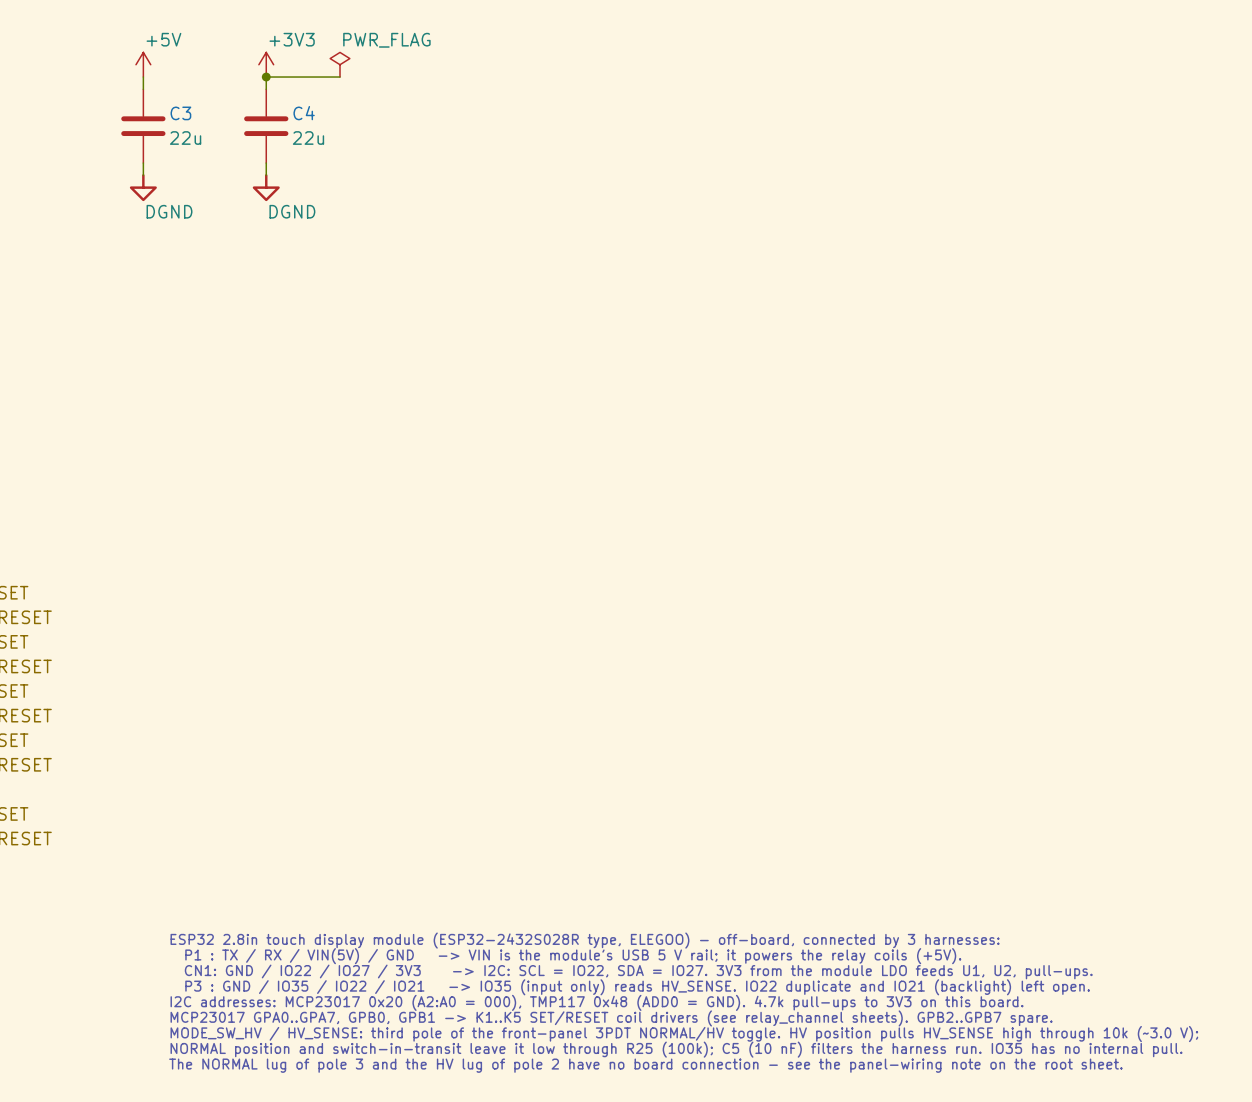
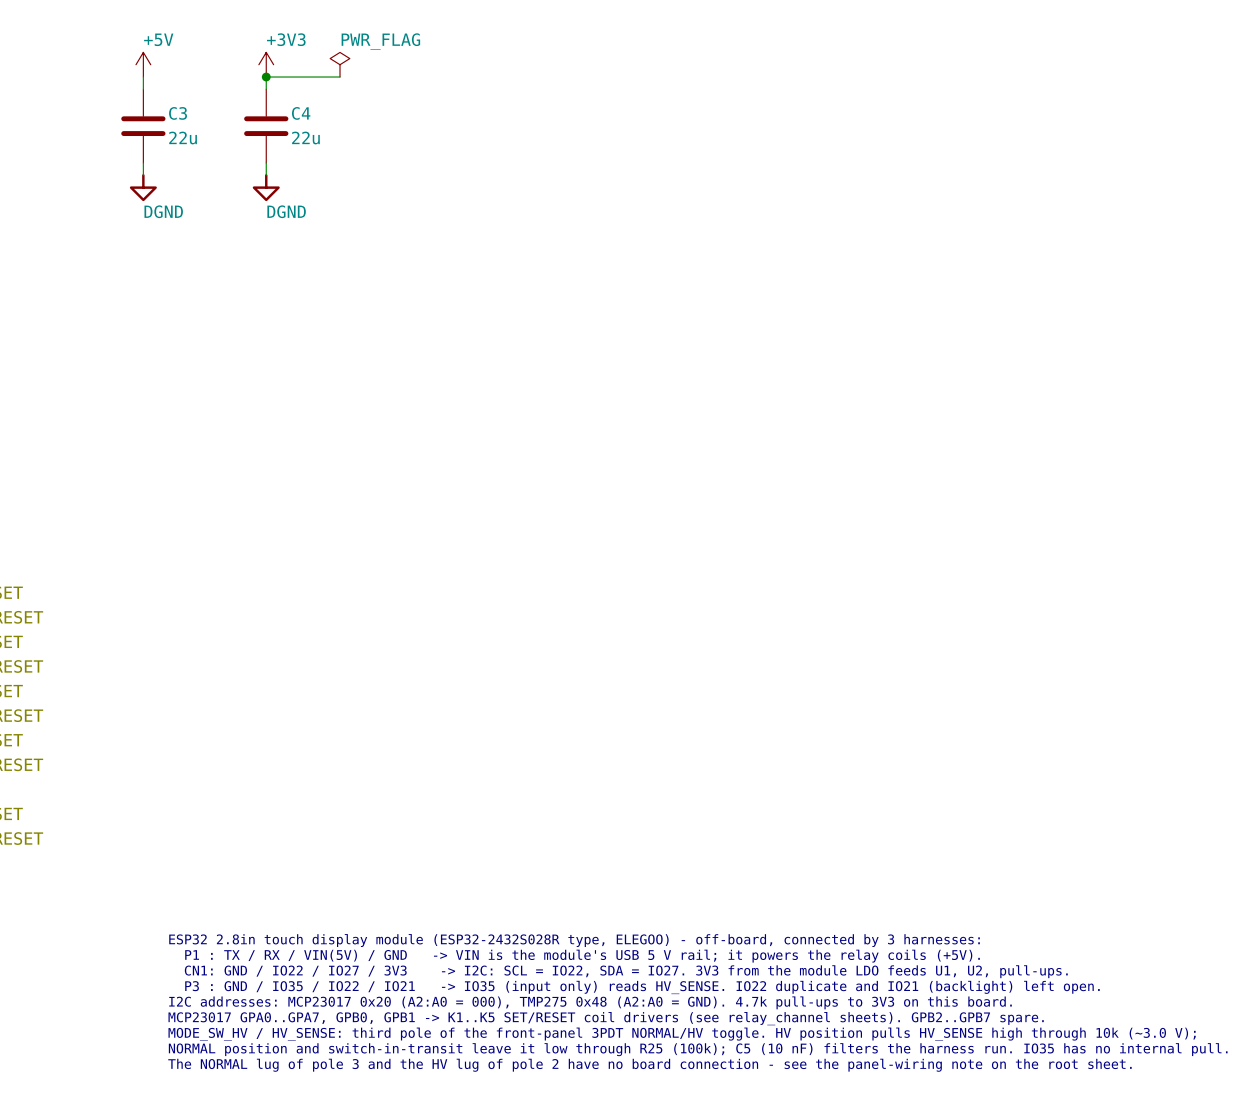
text: I2C addresses: MCP23017 0x20 (A2:A0 = 000), TMP117 0x48 (ADD0 = GND). 4.7k pull-ups to 3V3 on this board. (597, 1002) -> I2C addresses: MCP23017 0x20 (A2:A0 = 000), TMP275 0x48 (A2:A0 = GND). 4.7k pull-ups to 3V3 on this board. (590, 1002)

